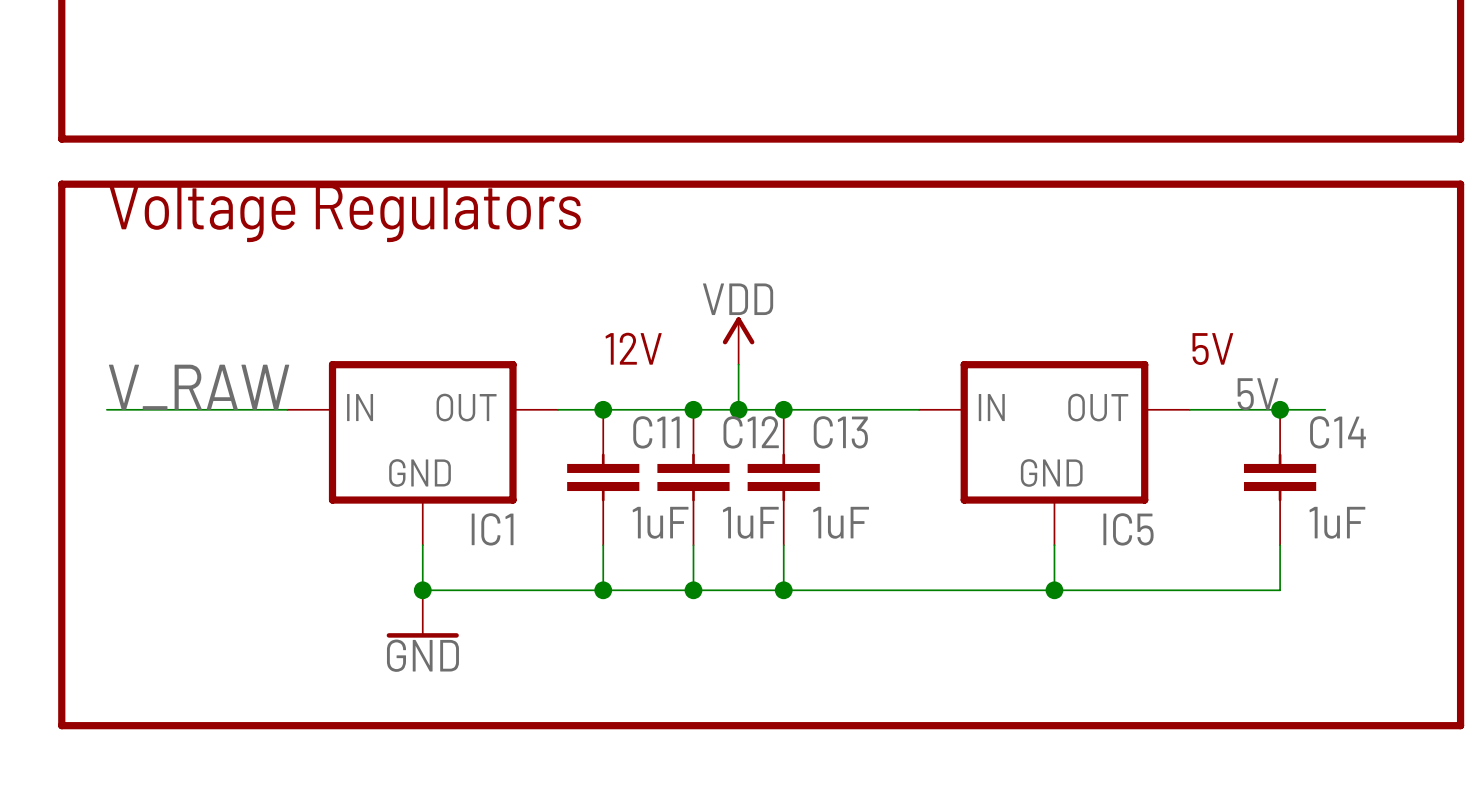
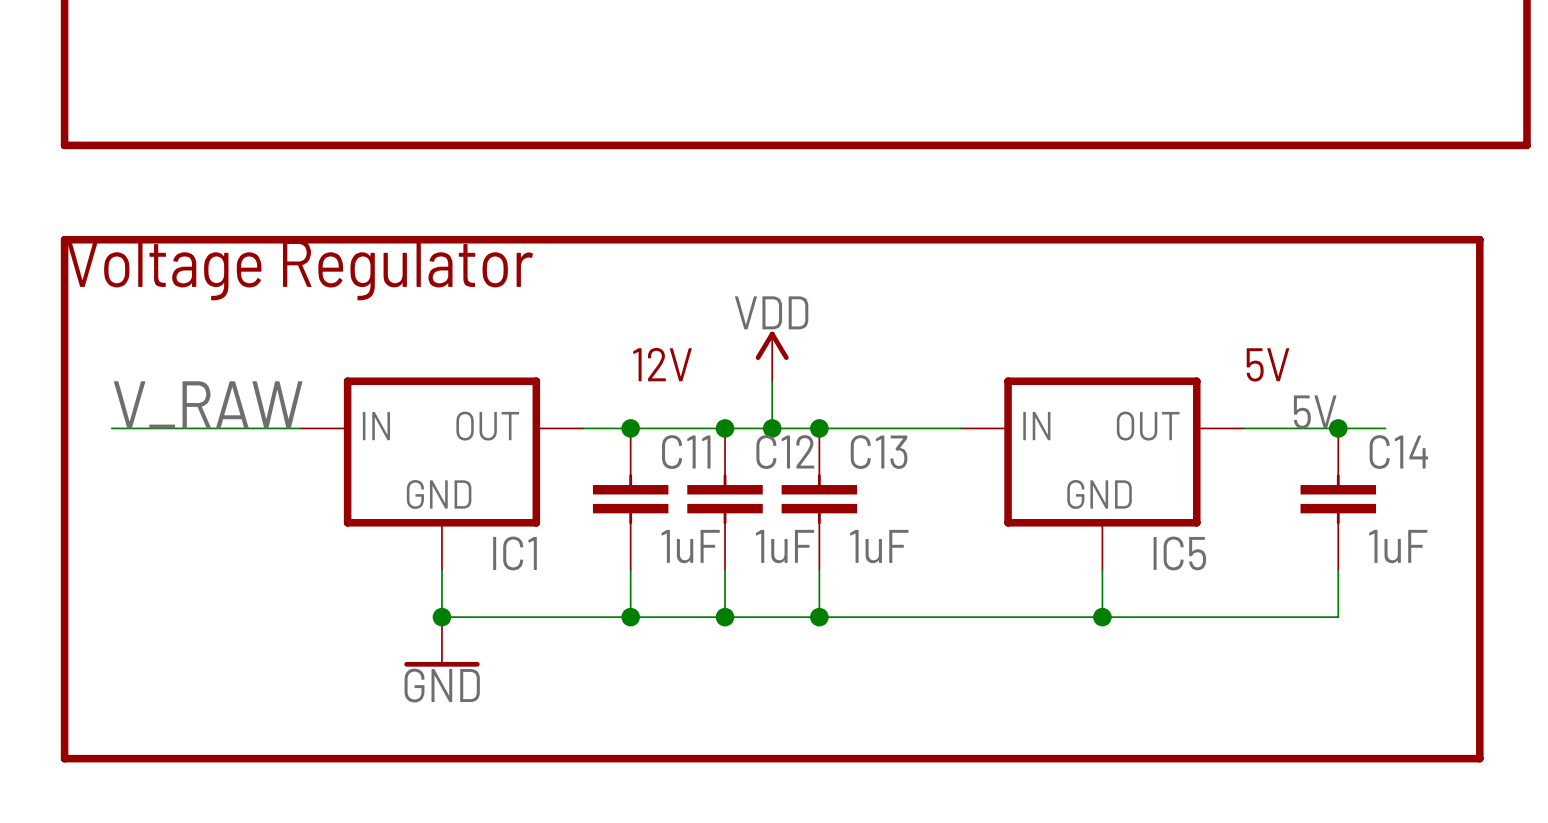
text: Voltage Regulators (344, 213) -> Voltage Regulator (299, 270)
line: (61, 229) (61, 184) (1460, 184) (1460, 725) (1415, 725) -> (64, 239) (1479, 239) (1479, 758)

